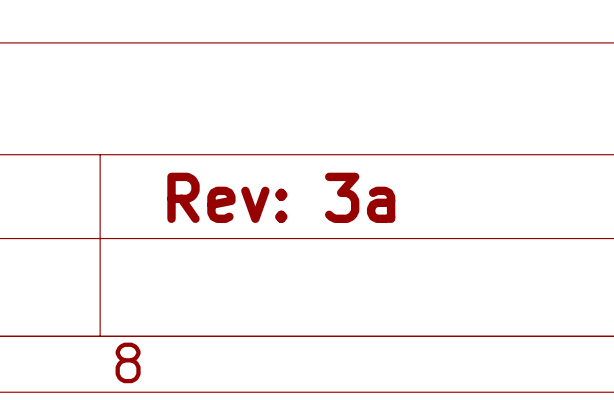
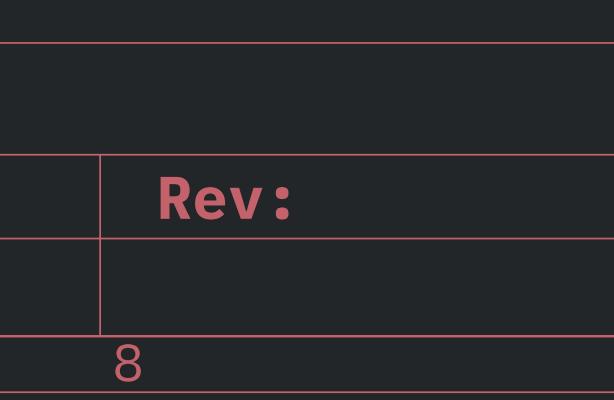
title block: Rev: 3a (281, 197) -> Rev: (224, 198)

